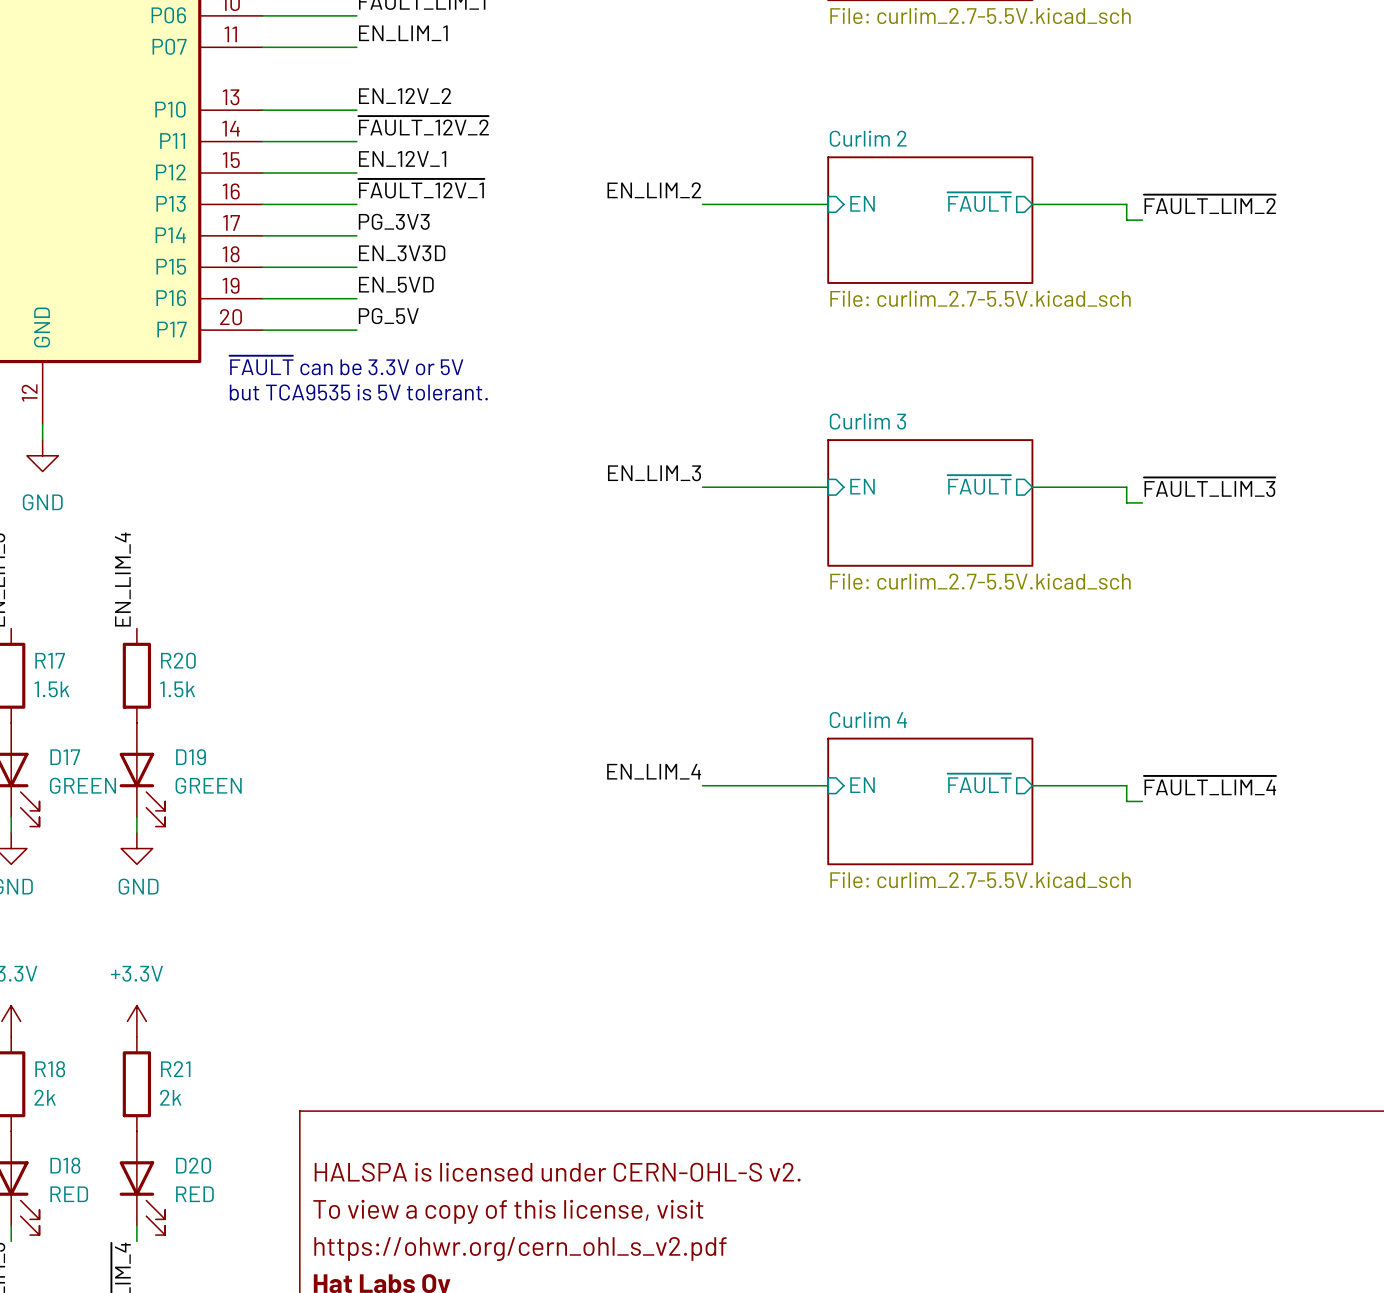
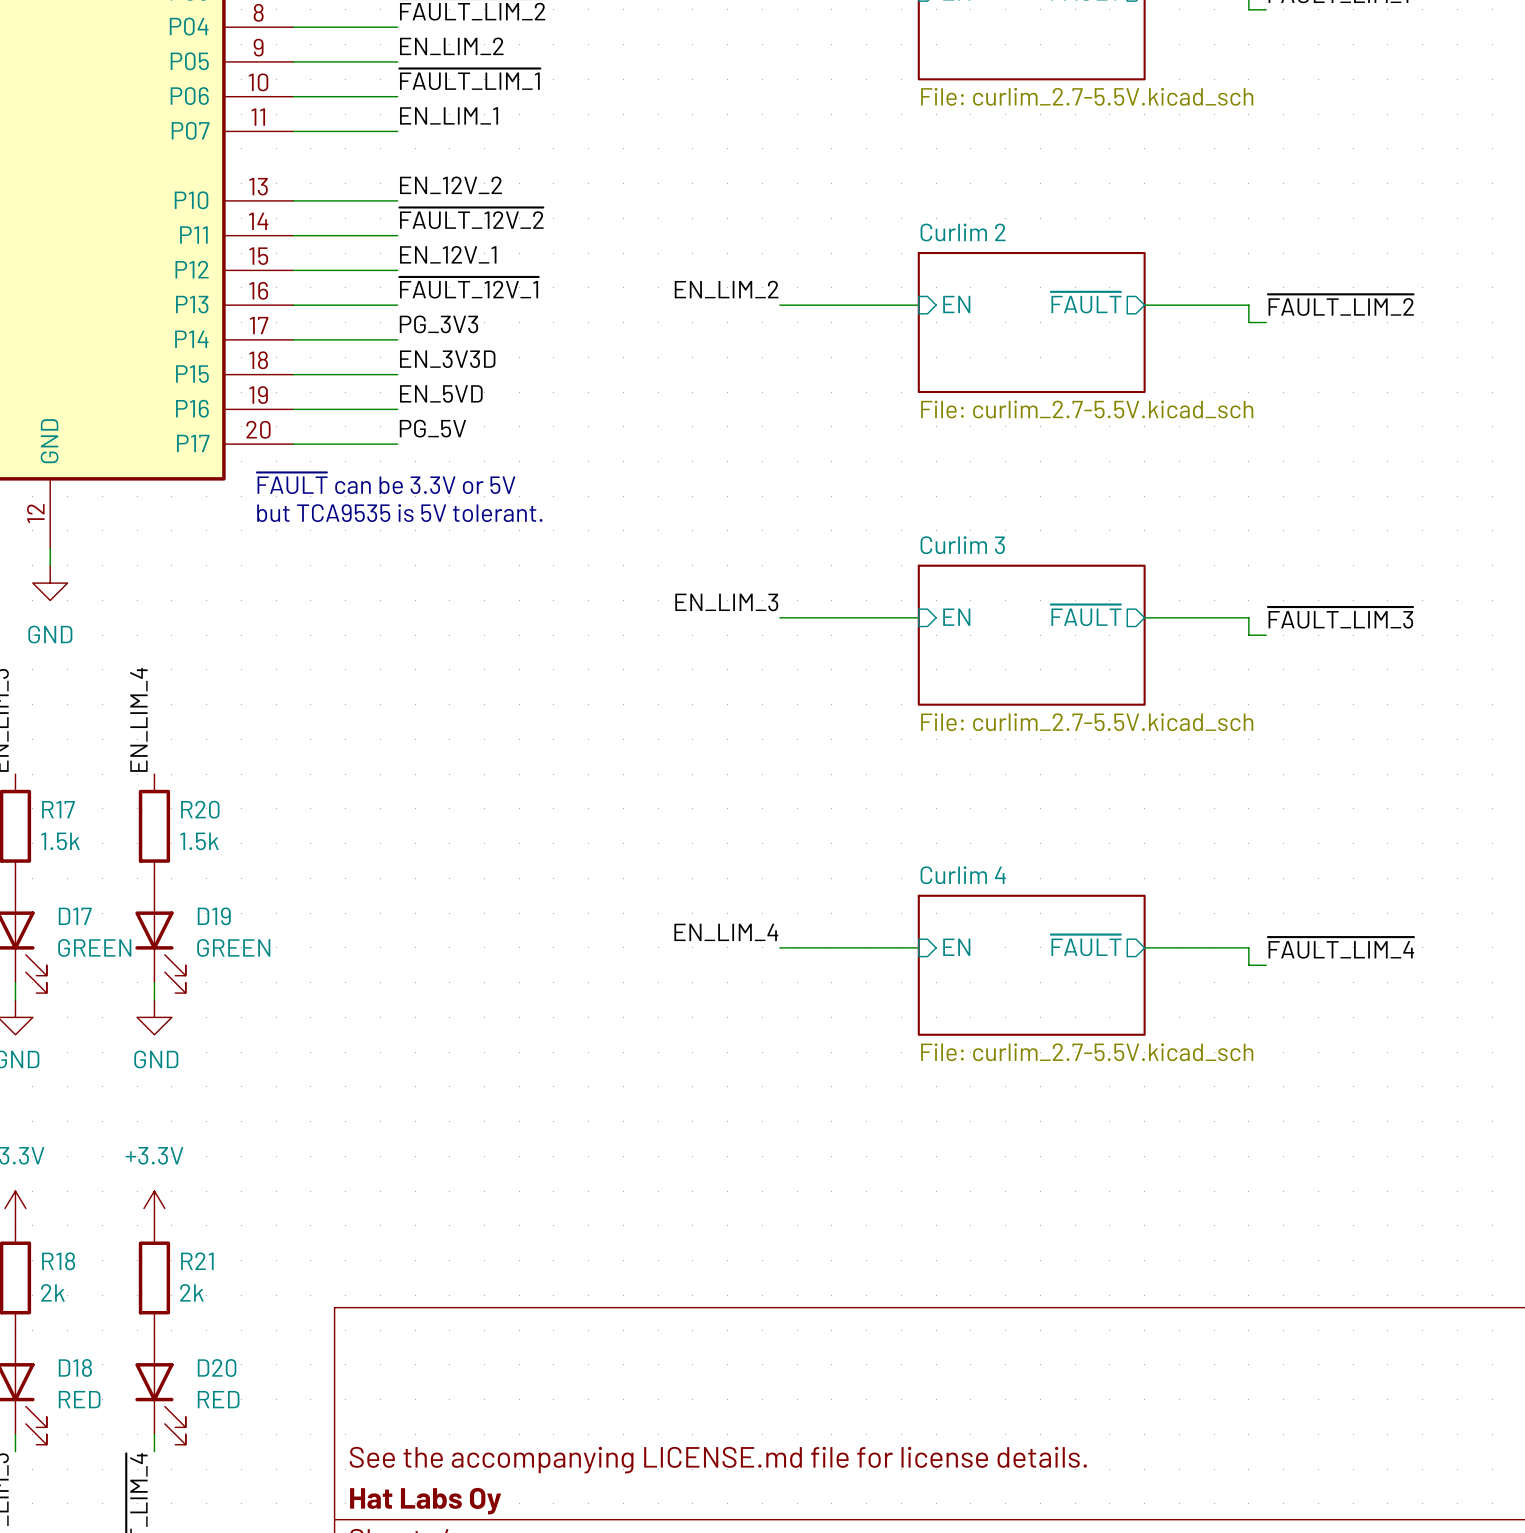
title block: HALSPA is licensed under CERN-OHL-S v2. (557, 1172) -> none
title block: To view a copy of this license, visit (508, 1211) -> none
title block: https://ohwr.org/cern_ohl_s_v2.pdf (520, 1249) -> See the accompanying LICENSE.md file for license details. (718, 1460)

